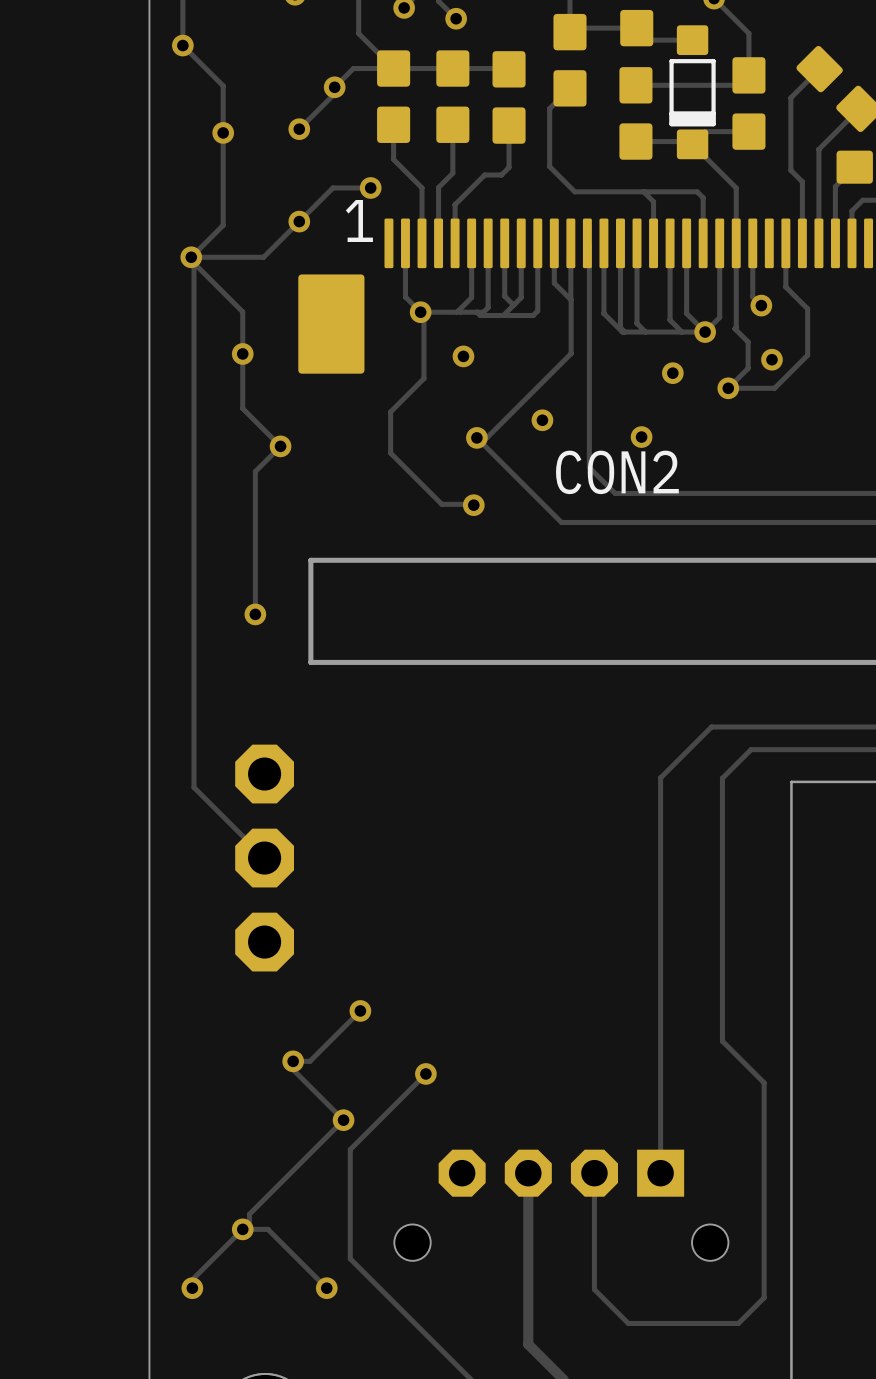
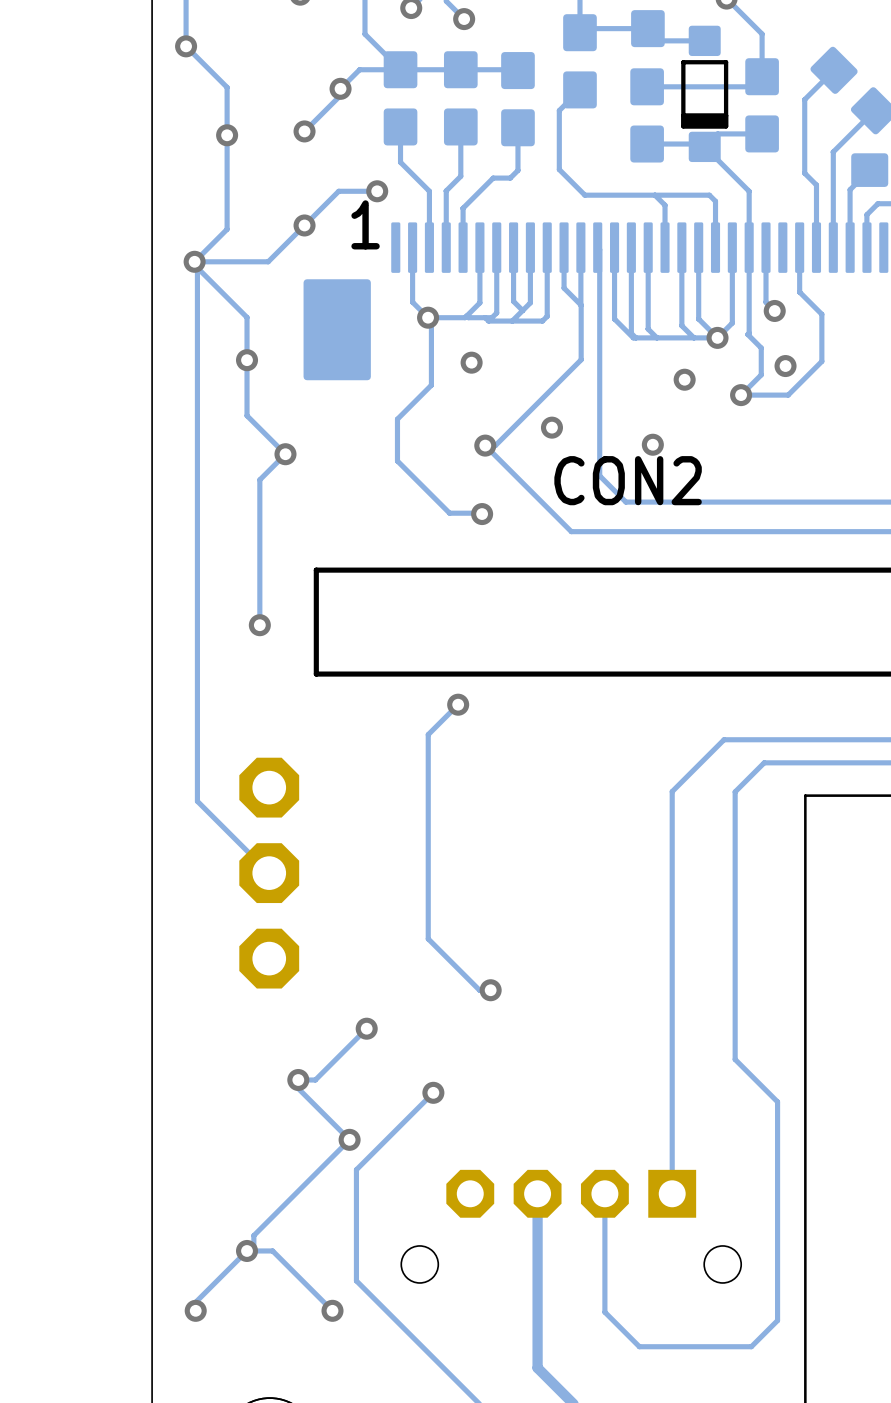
track: none -> (458, 704) (428, 734) (428, 938) (479, 990) (490, 990)
via: none -> (458, 704)
via: none -> (490, 990)

